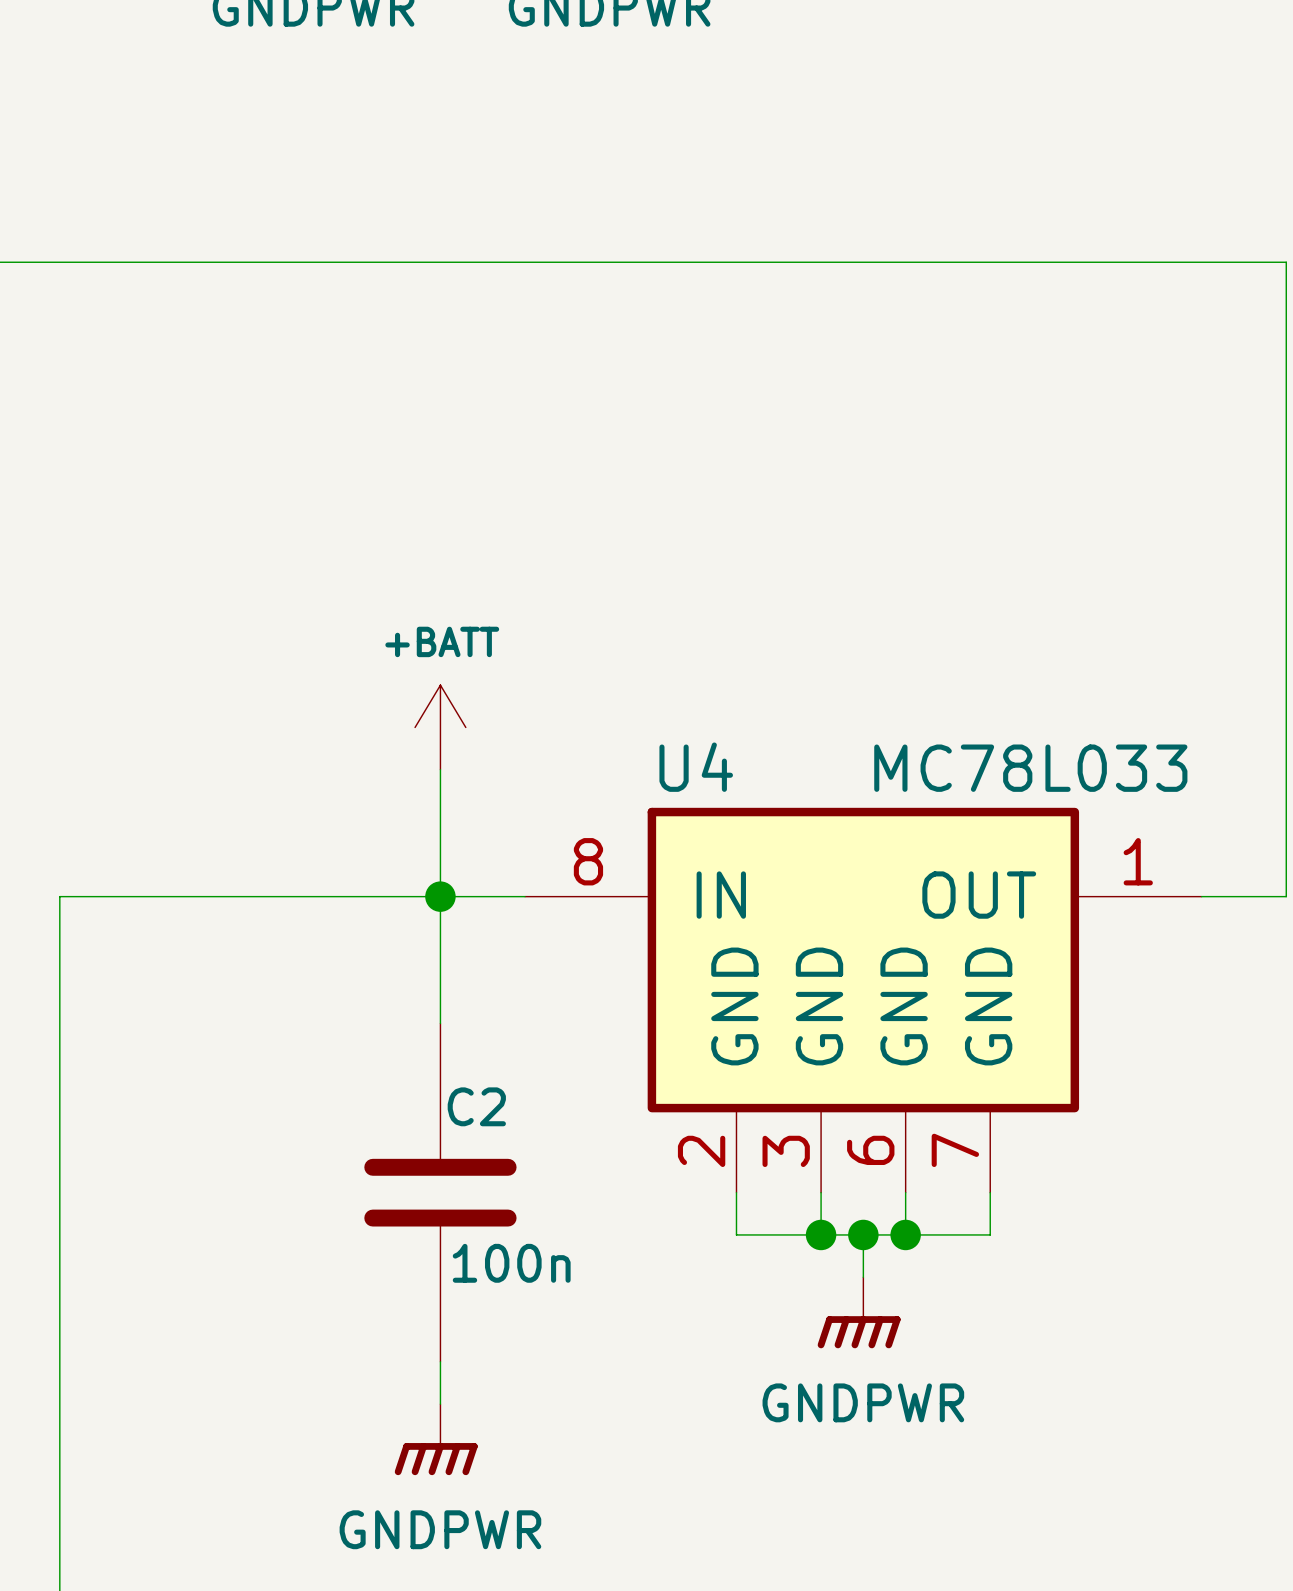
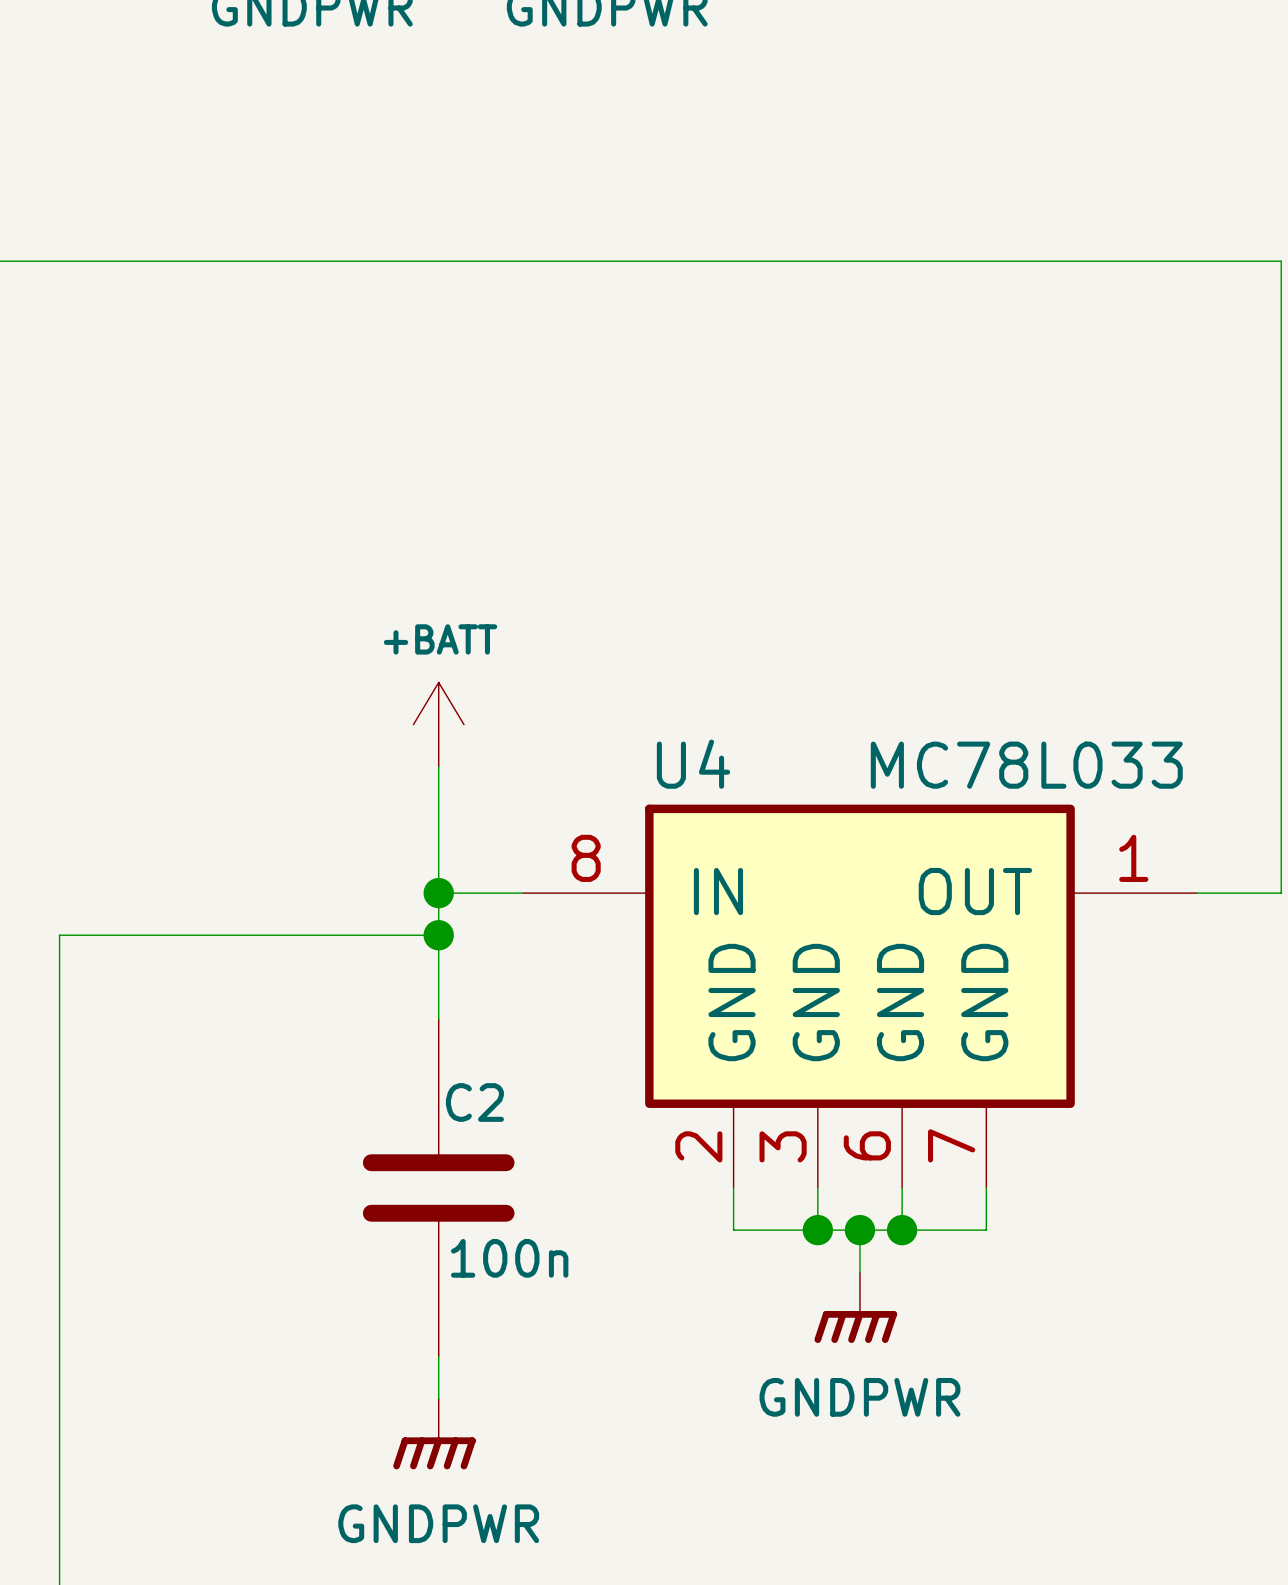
wire: (440, 896) (59, 896) (59, 938) -> (438, 935) (59, 935)
junction: none -> (438, 935)

